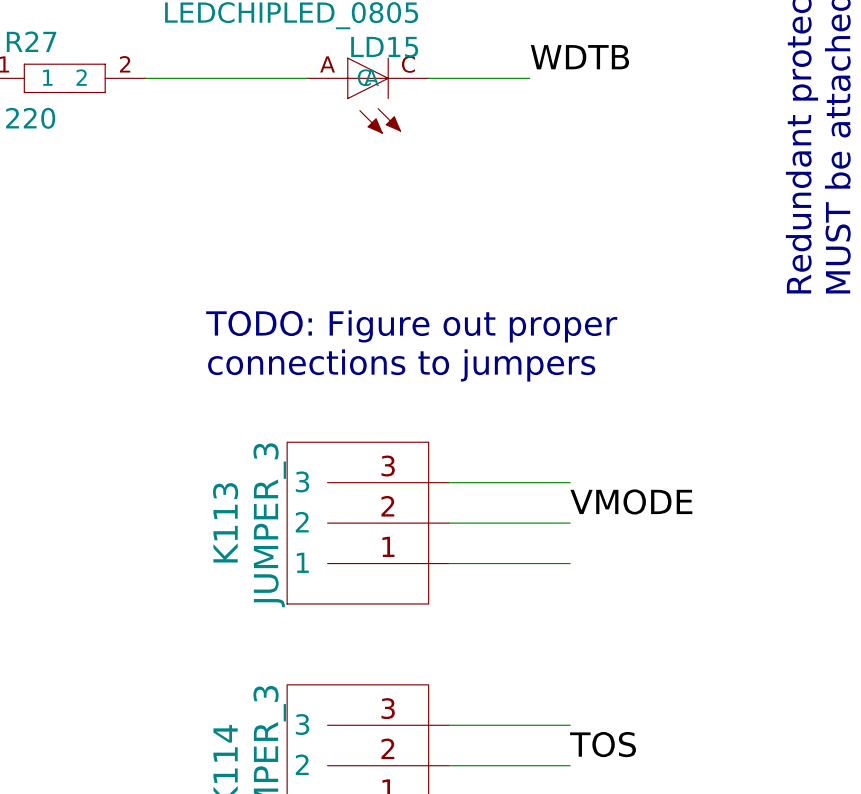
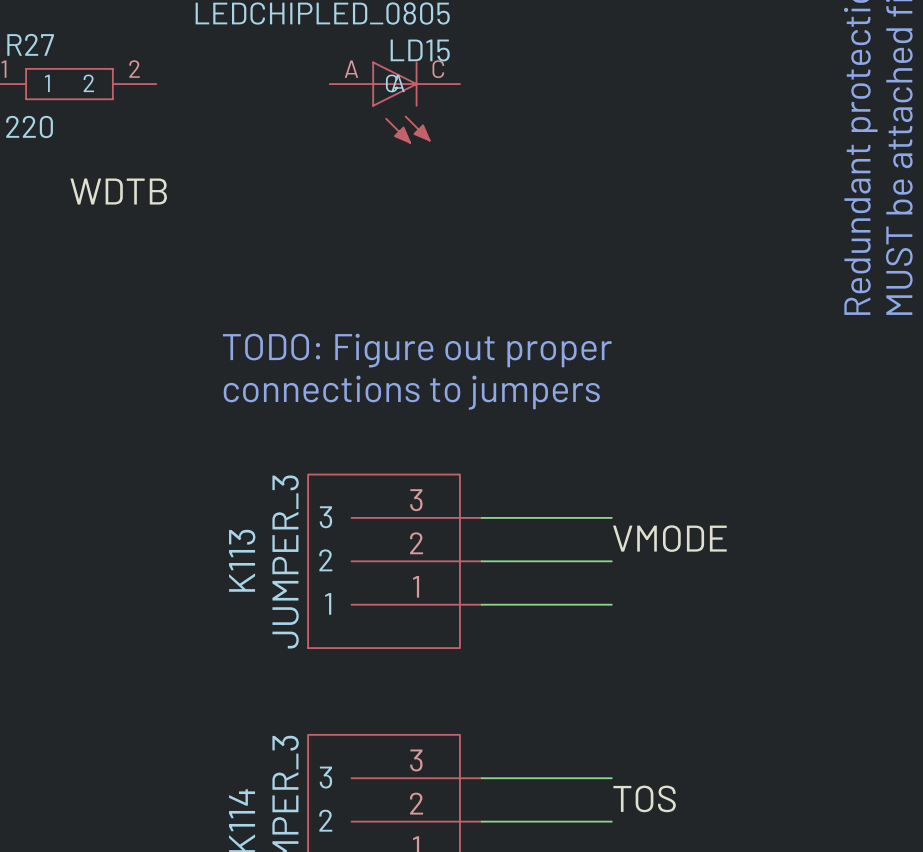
label: WDTB (579, 57) -> none
wire: (145, 78) (307, 78) -> none
wire: (428, 78) (529, 78) -> none
label: none -> WDTB (118, 191)

